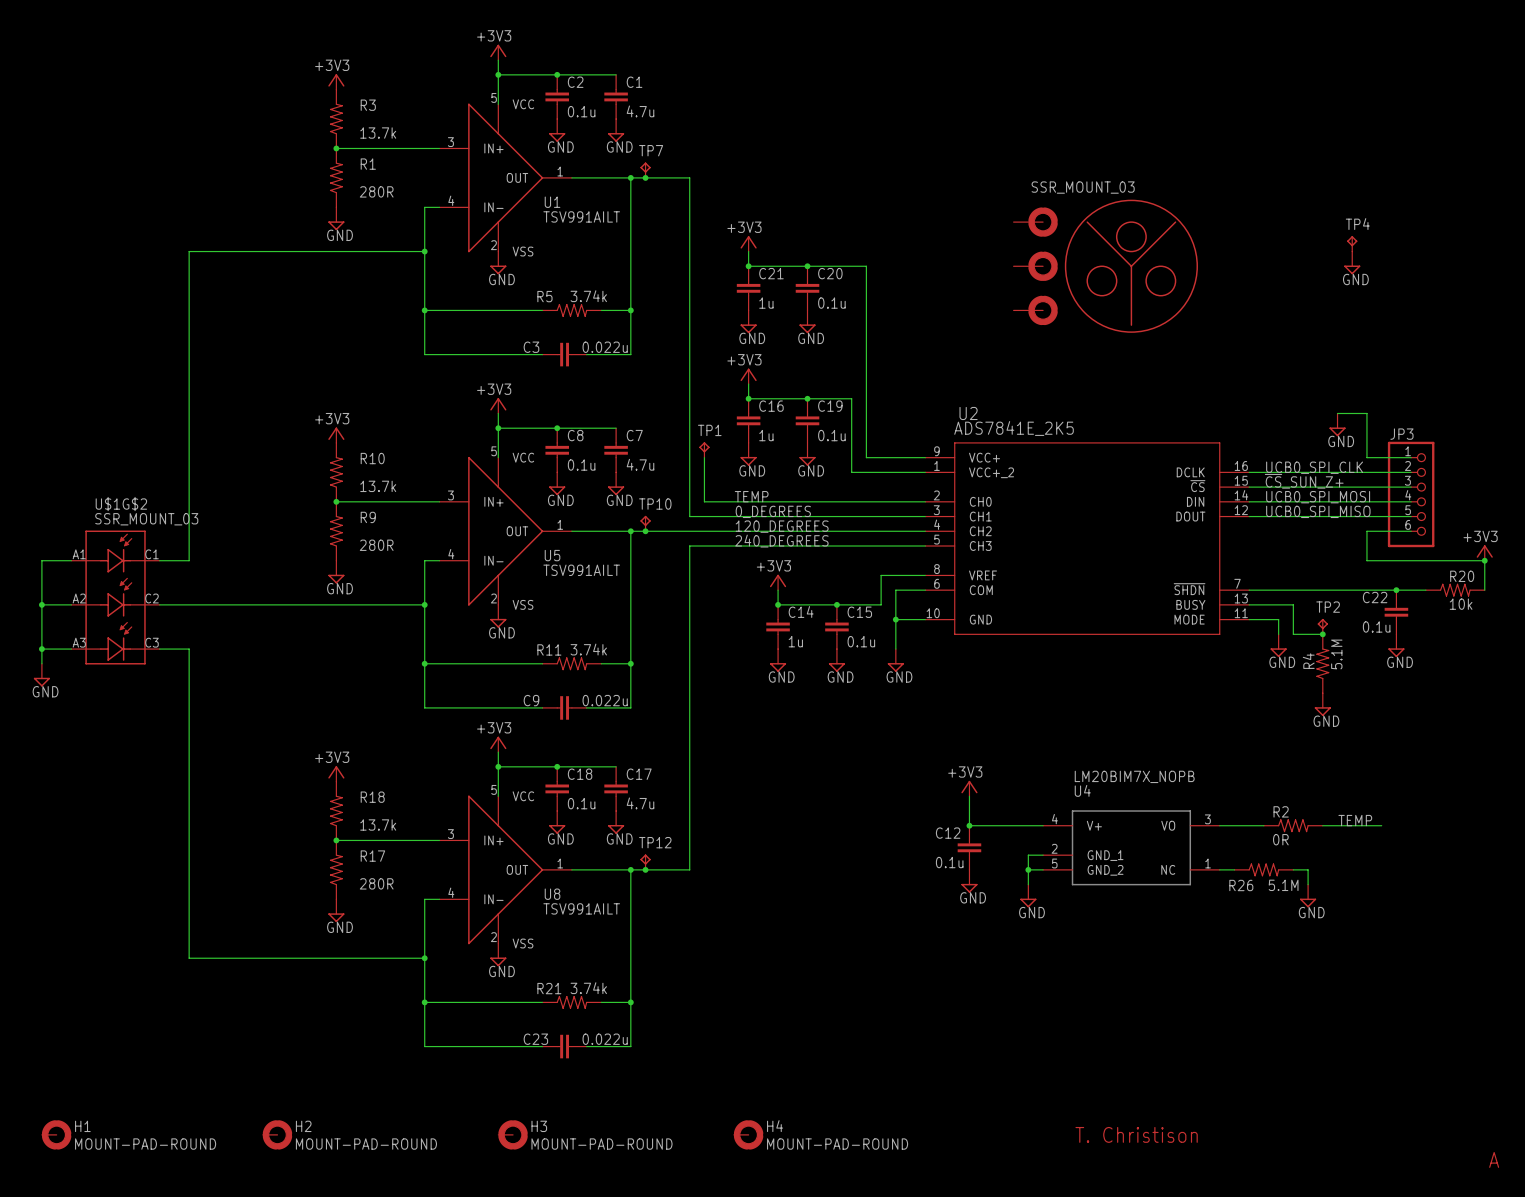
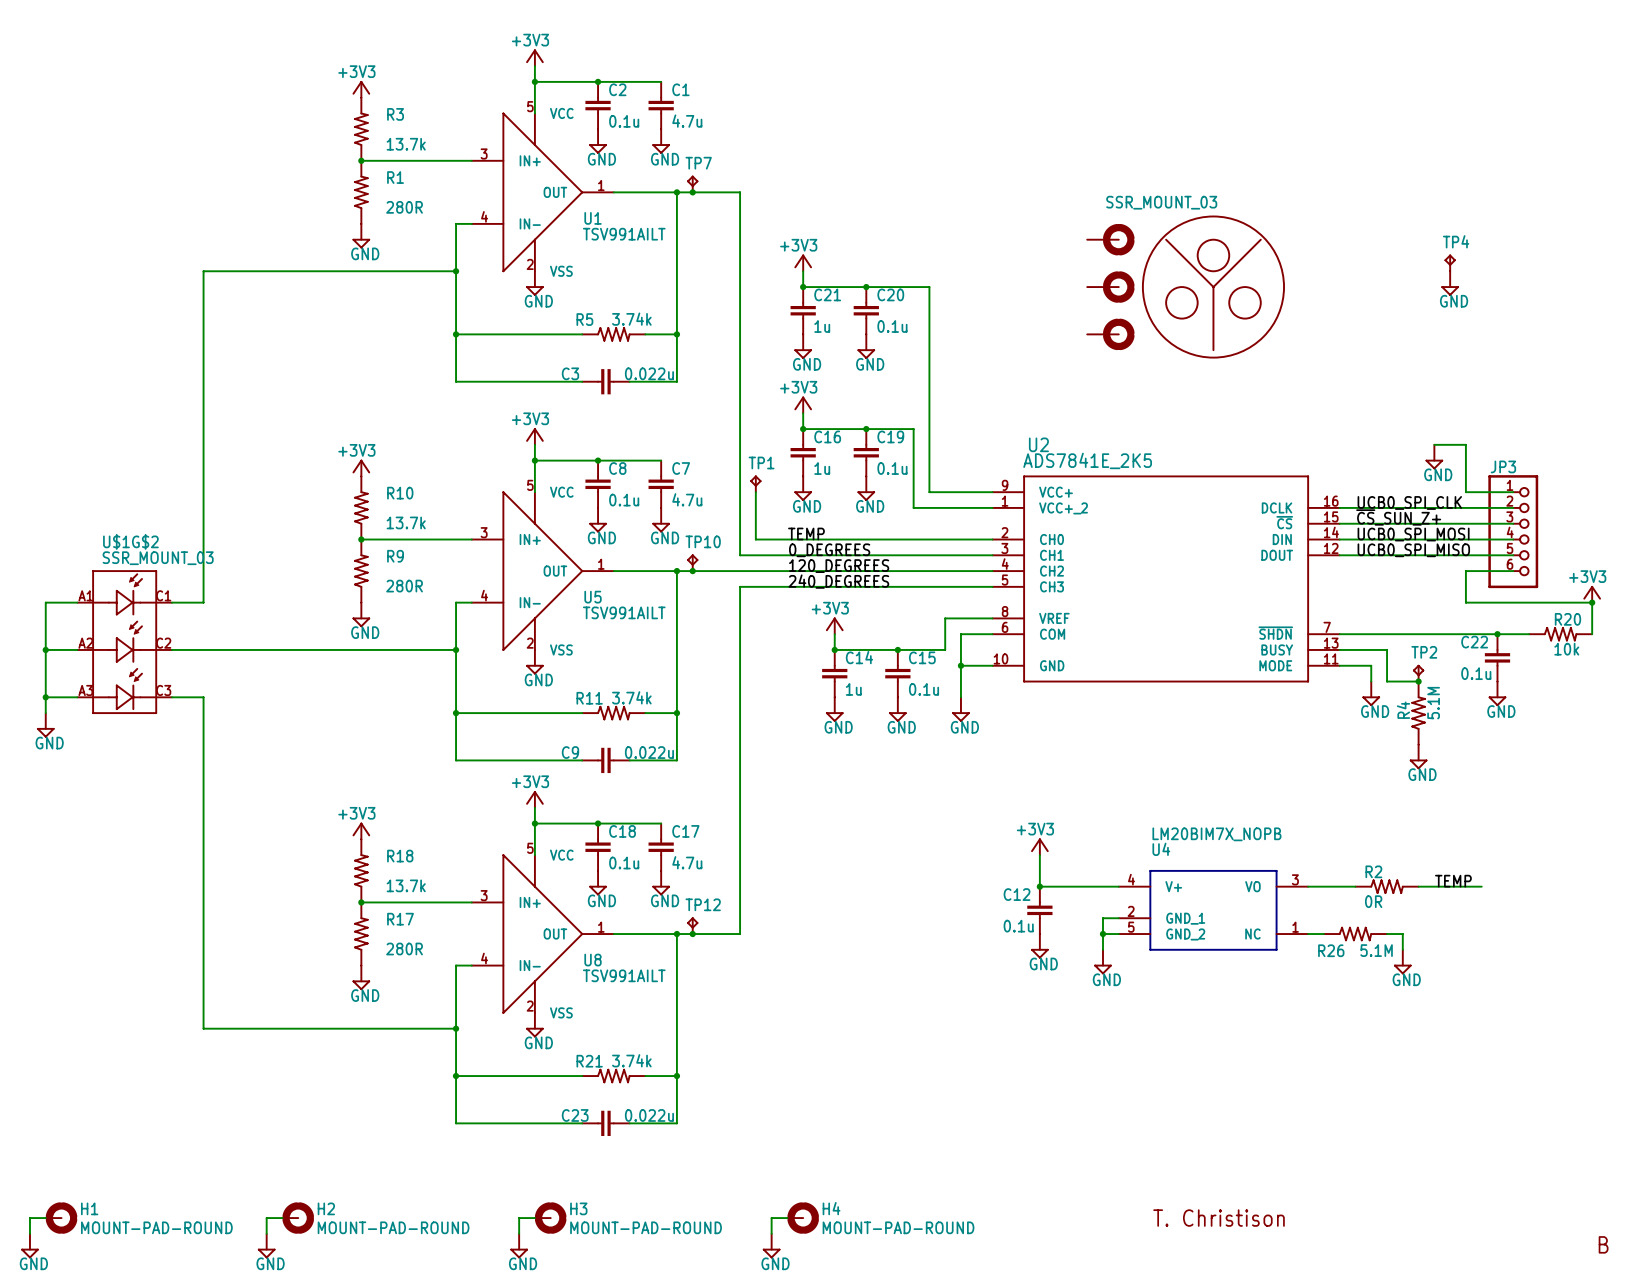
wire: none -> (45, 1218) (29, 1218) (29, 1233)
wire: none -> (282, 1218) (266, 1218) (266, 1233)
wire: none -> (534, 1218) (519, 1218) (519, 1233)
wire: none -> (787, 1218) (771, 1218) (771, 1233)
text: A (1494, 1159) -> B (1603, 1244)
power symbol: none -> GND (29, 1246)
power symbol: none -> GND (266, 1246)
power symbol: none -> GND (519, 1246)
power symbol: none -> GND (771, 1246)

